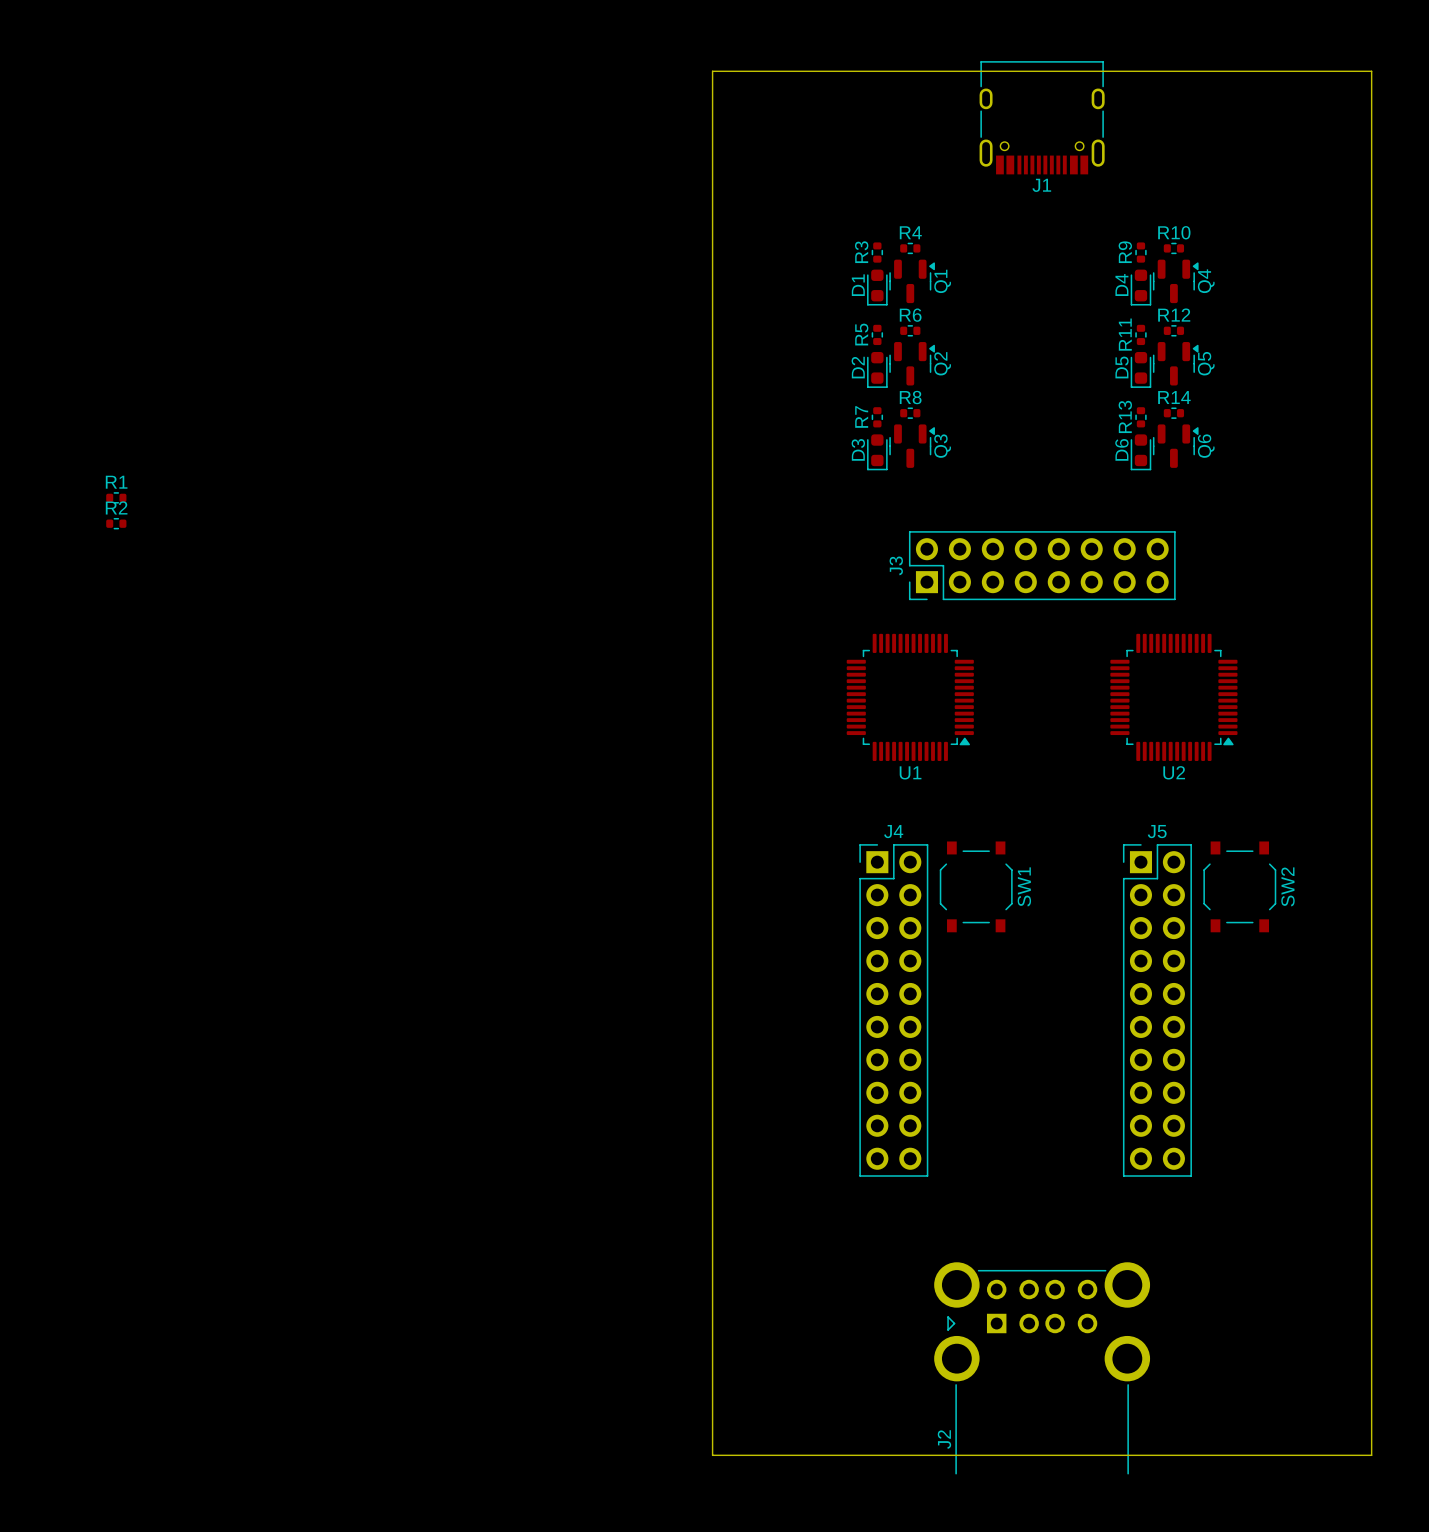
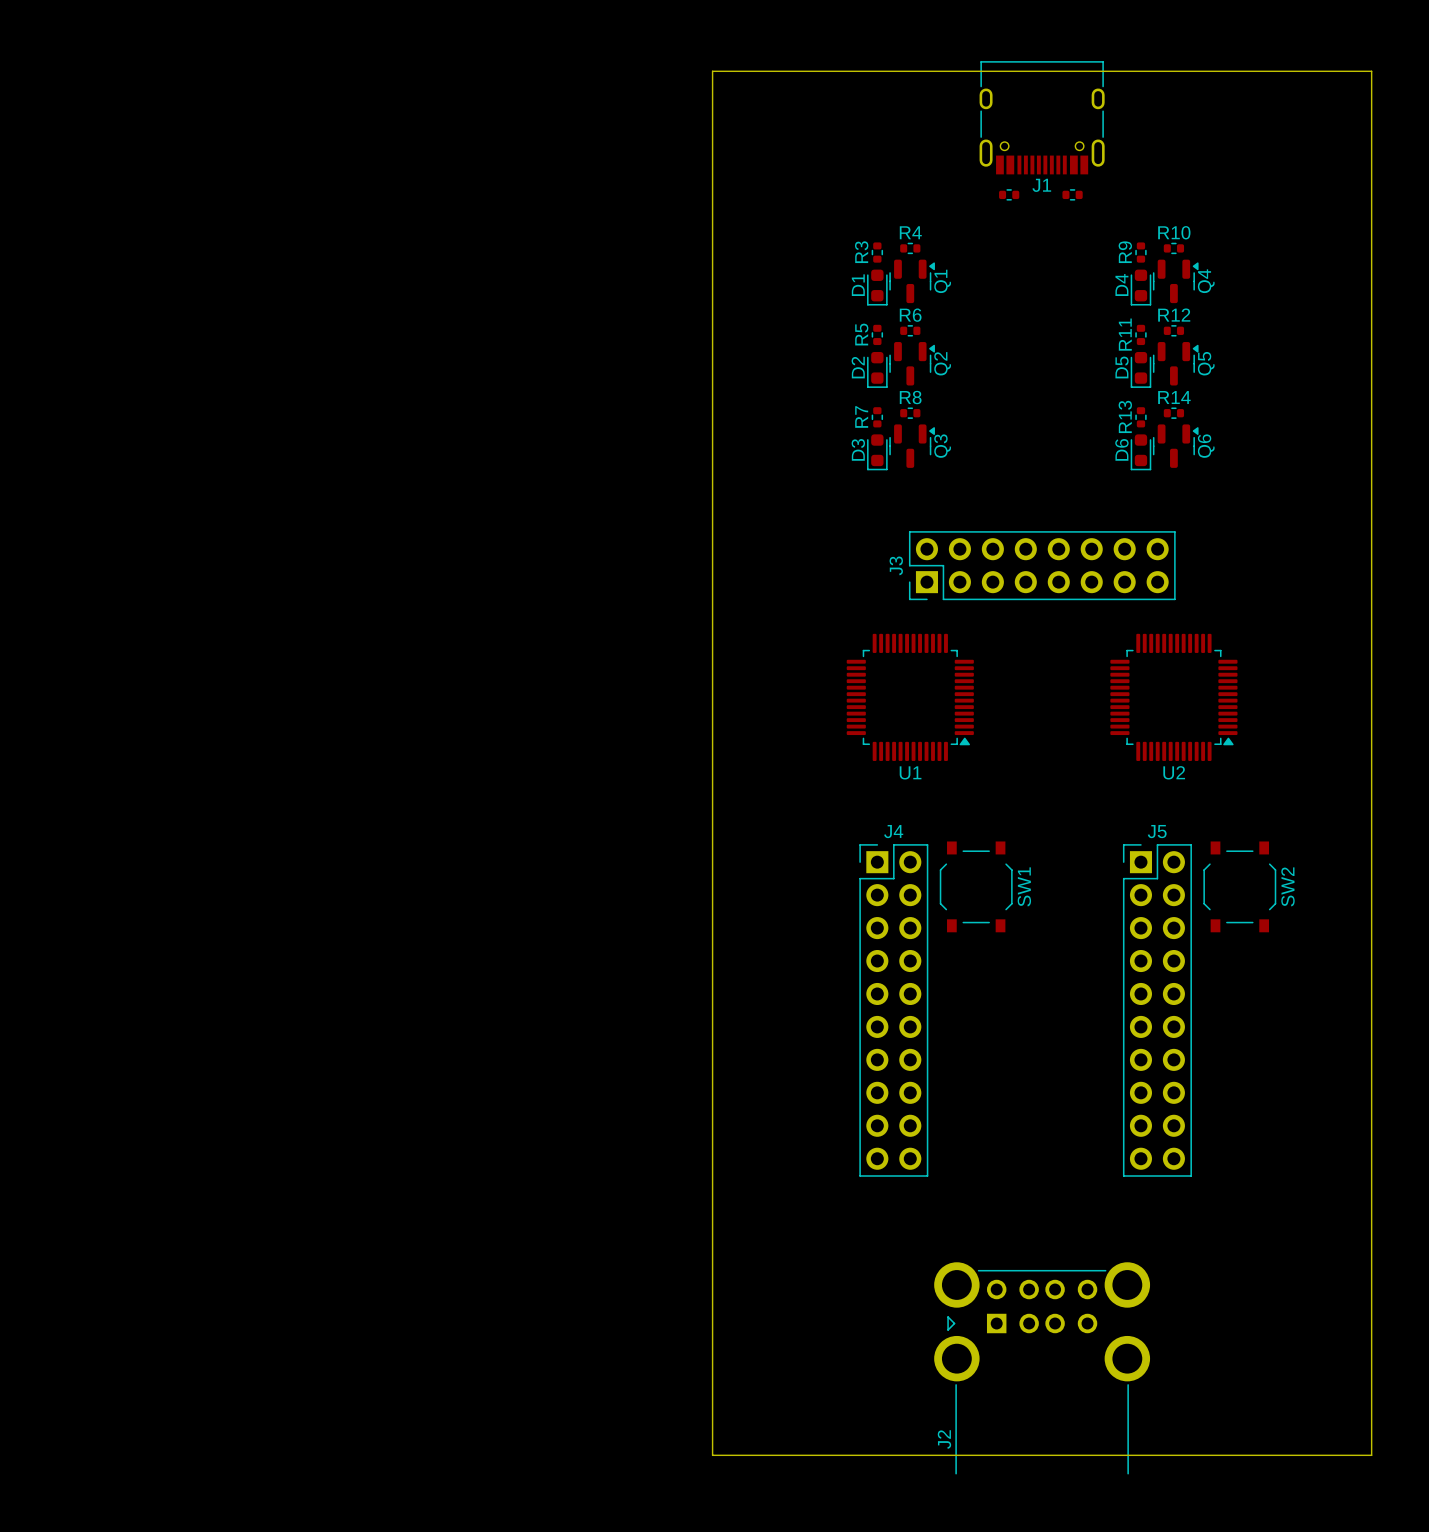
part: none -> (1009, 194)
part: none -> (1072, 194)
R1: (116, 497) -> none
R2: (116, 523) -> none

